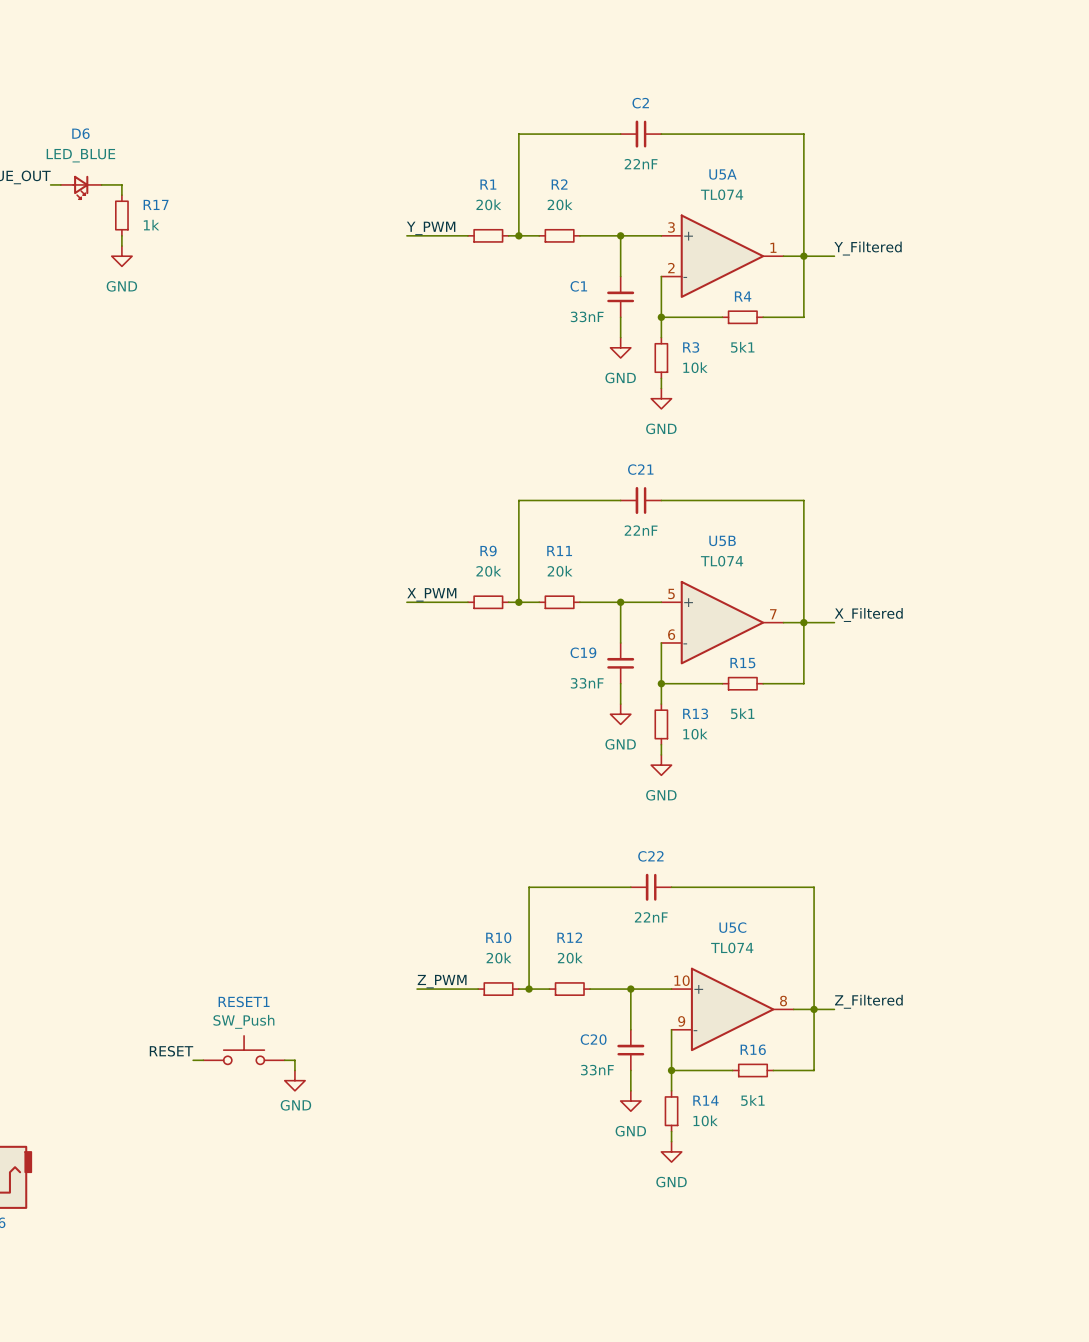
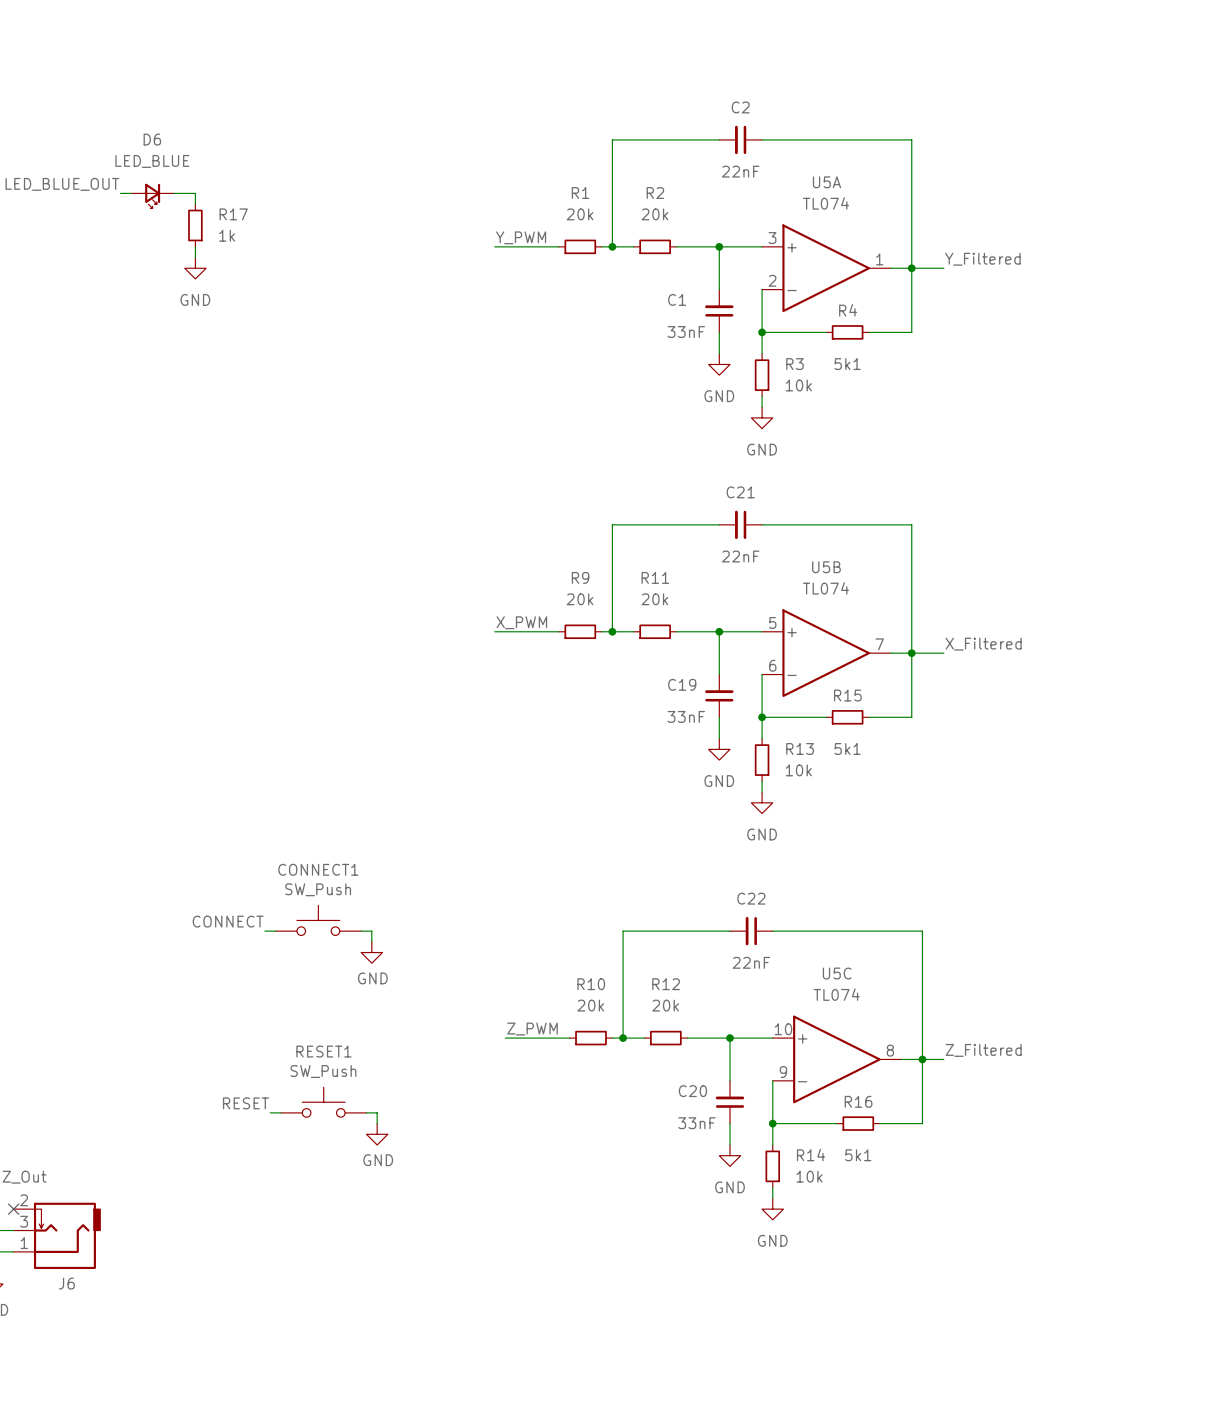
CONNECT1: none -> SW_Push (318, 920)
label: none -> CONNECT (228, 921)
wire: none -> (264, 931) (275, 931)
wire: none -> (361, 931) (371, 931) (371, 941)
power symbol: none -> GND (371, 952)

